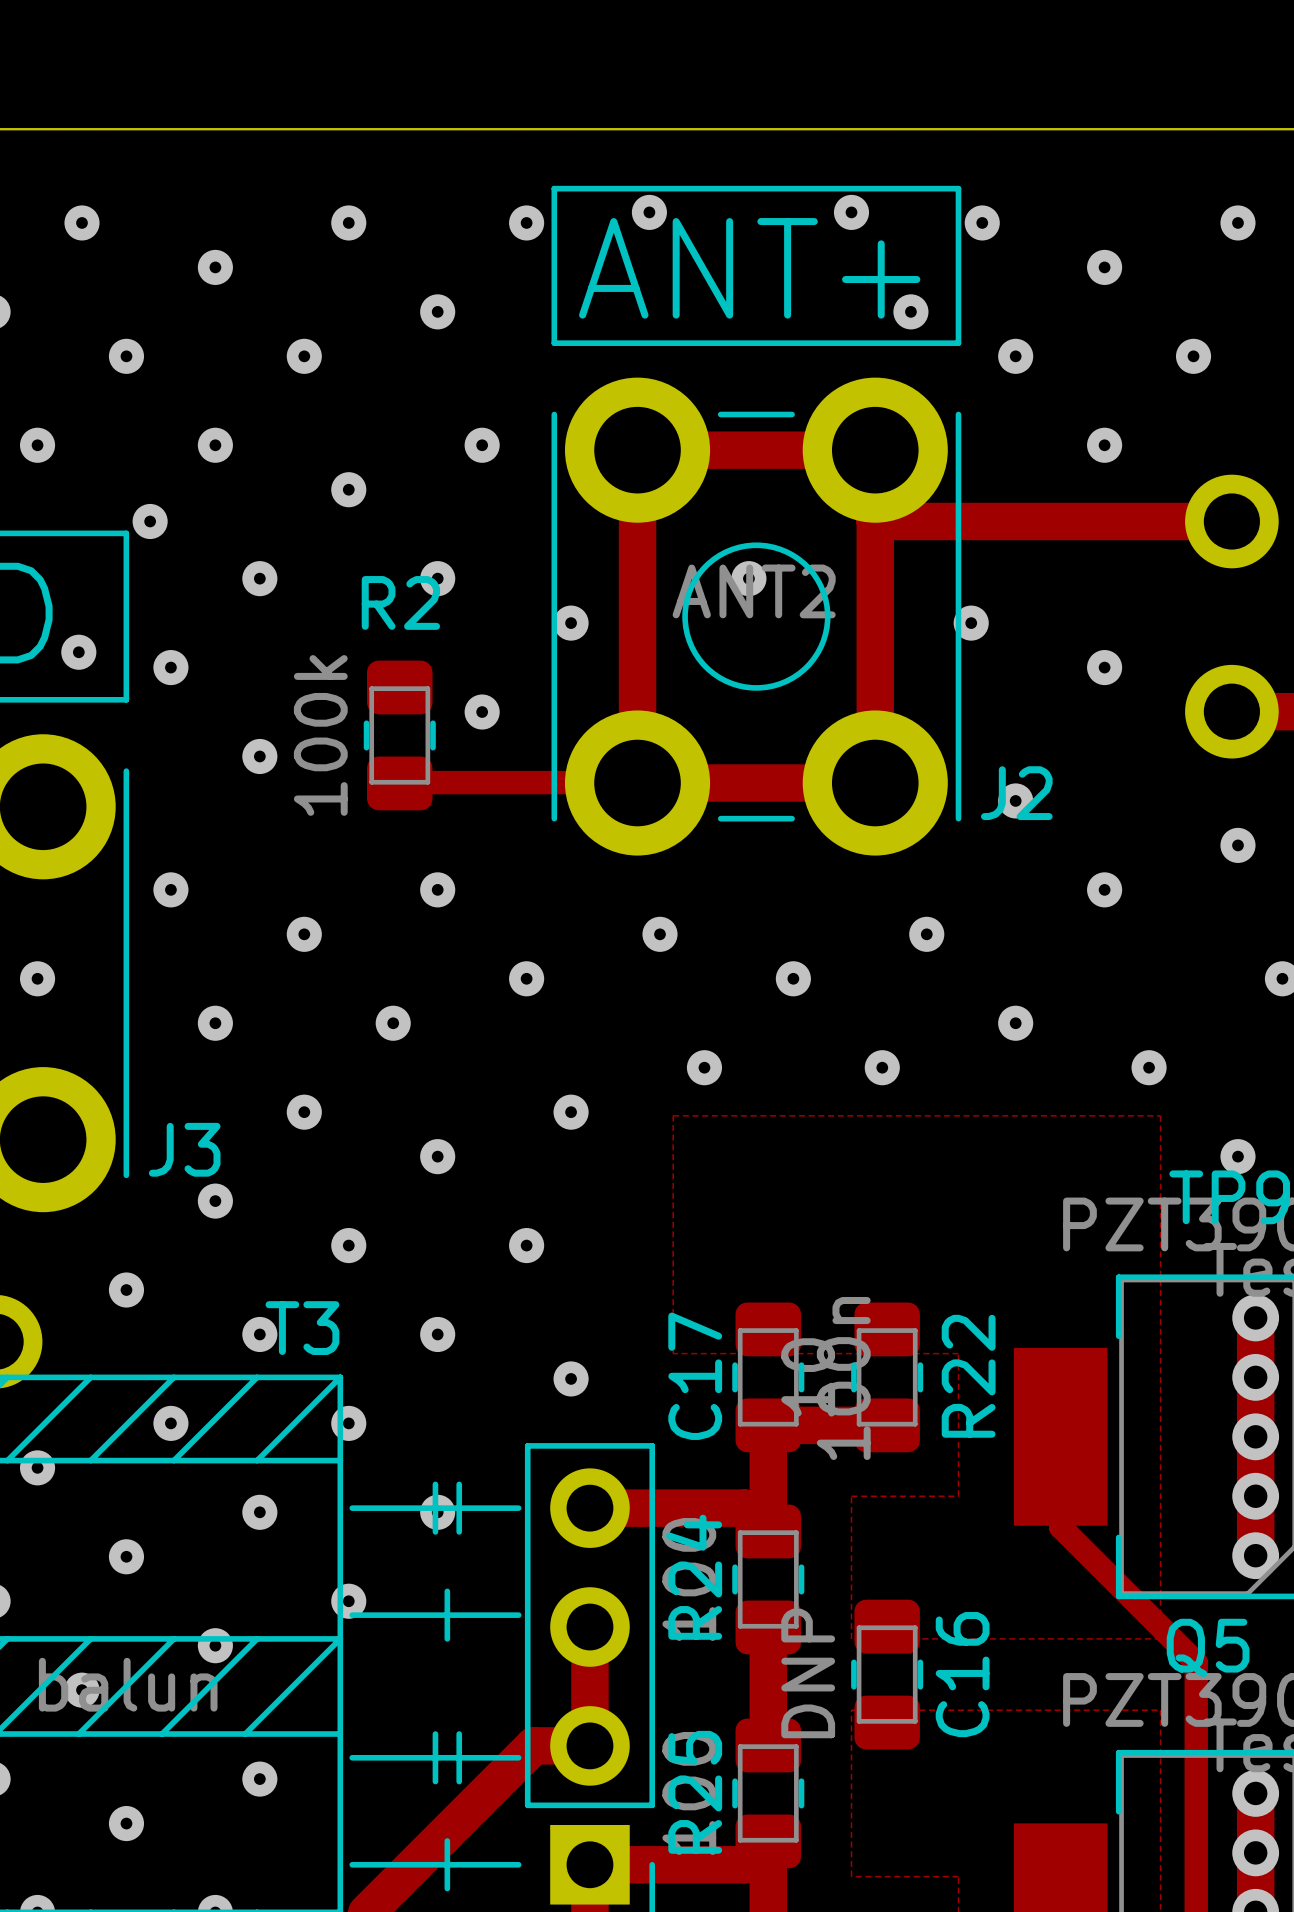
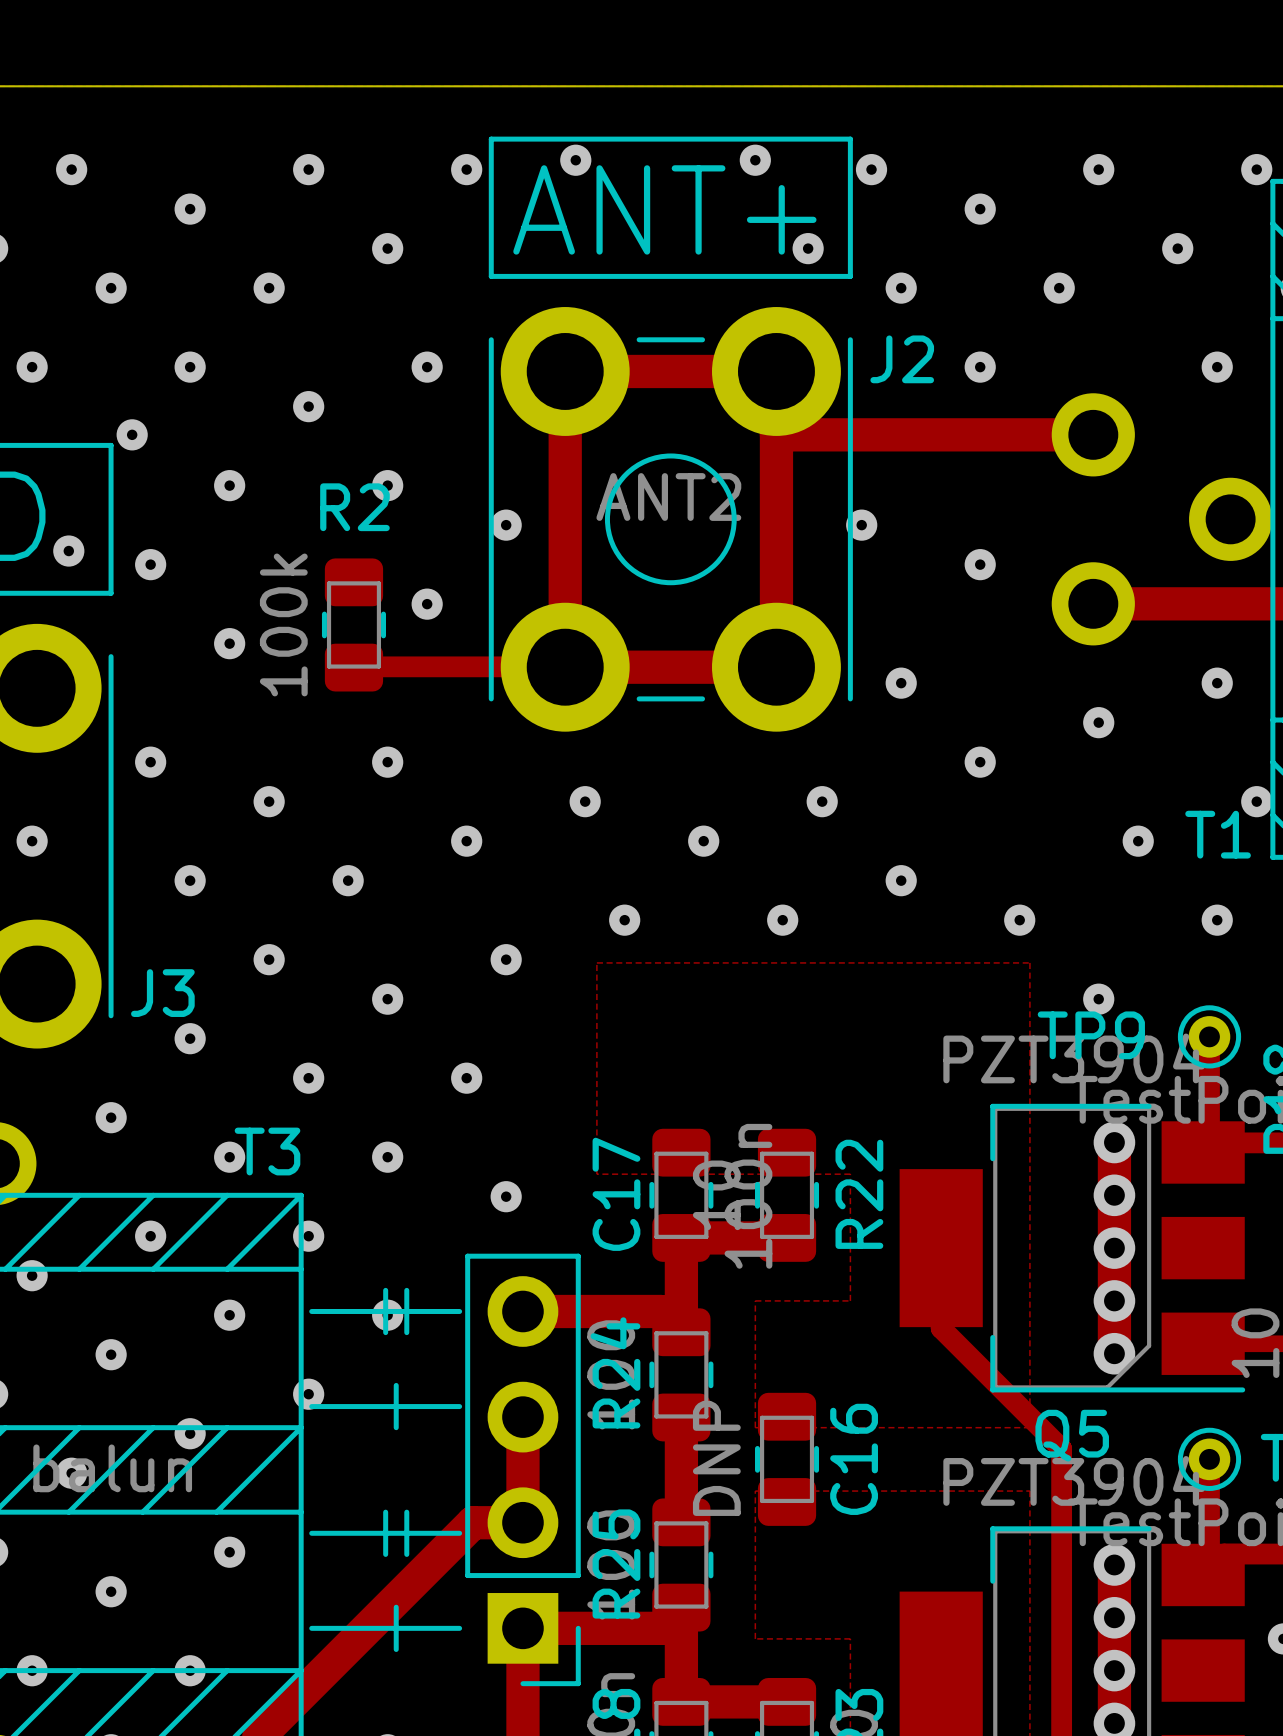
via: (748, 578) -> none
J2 name position: J2 (1016, 793) -> J2 (902, 359)

